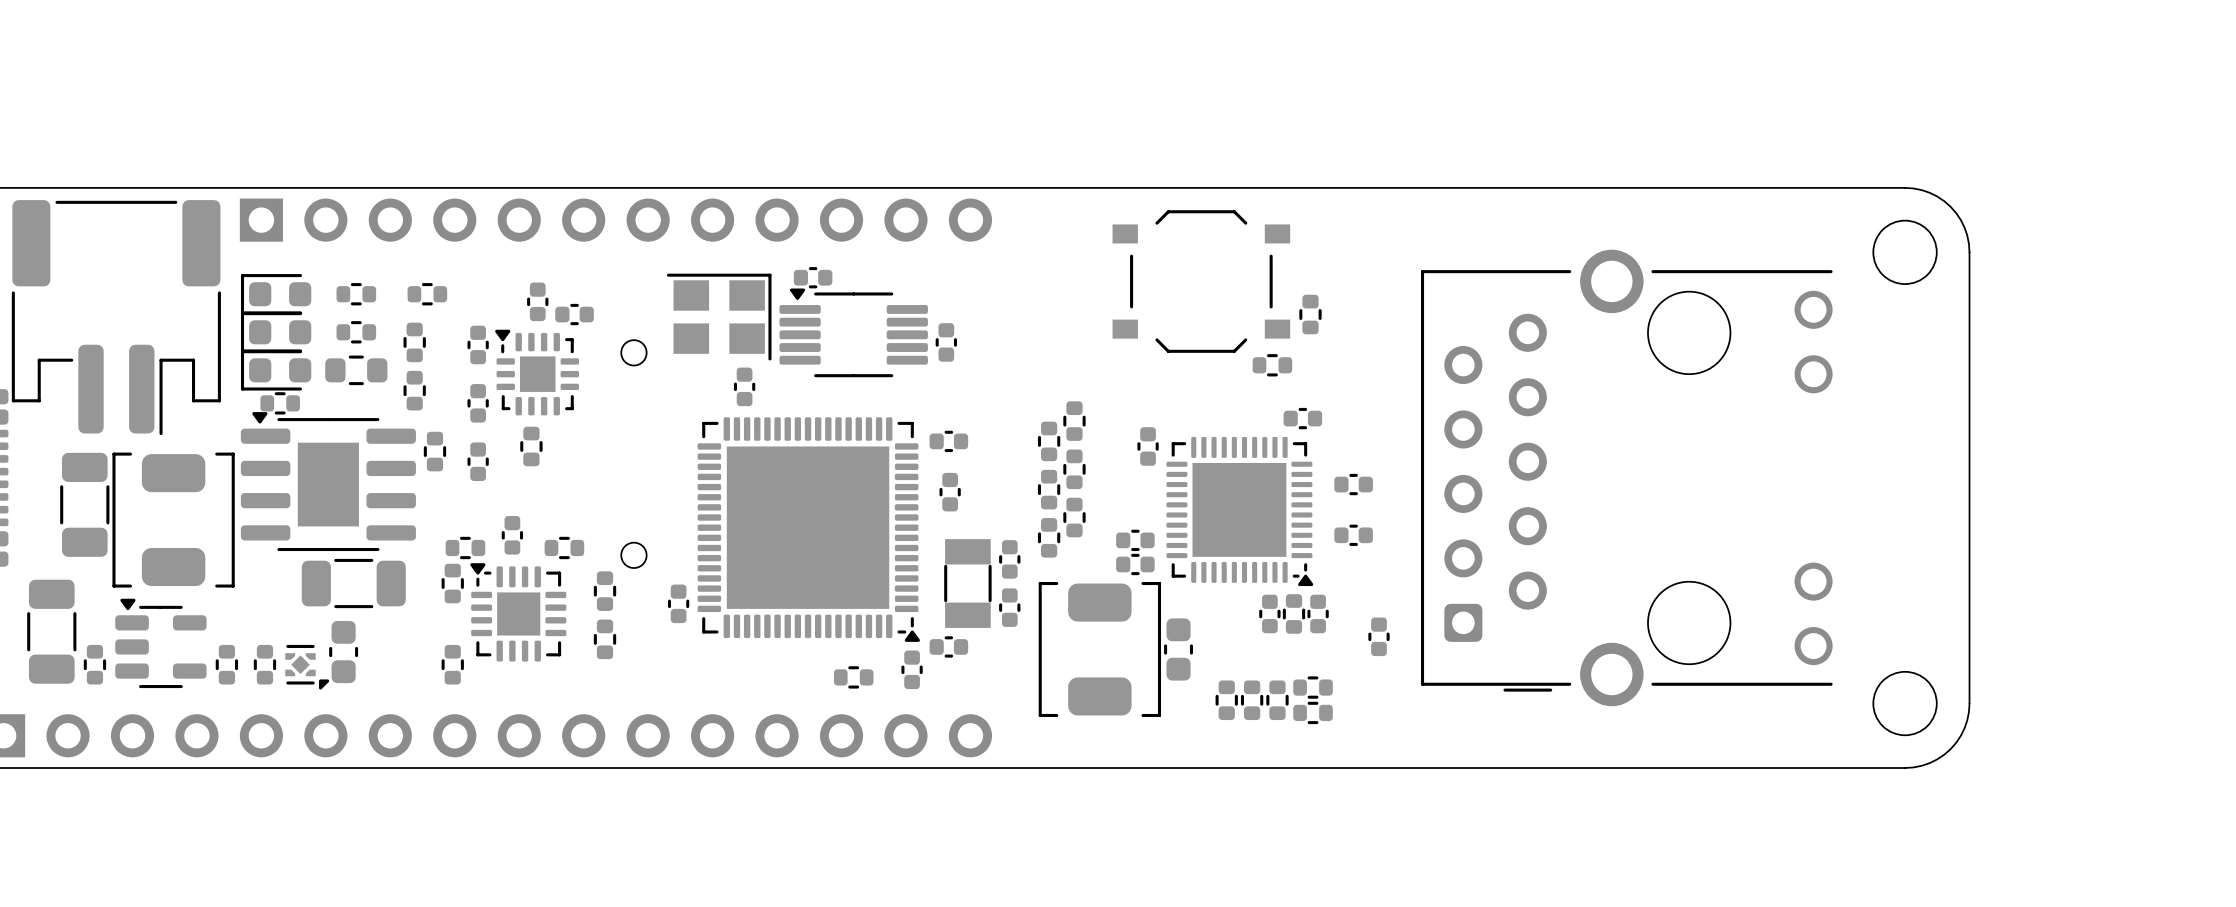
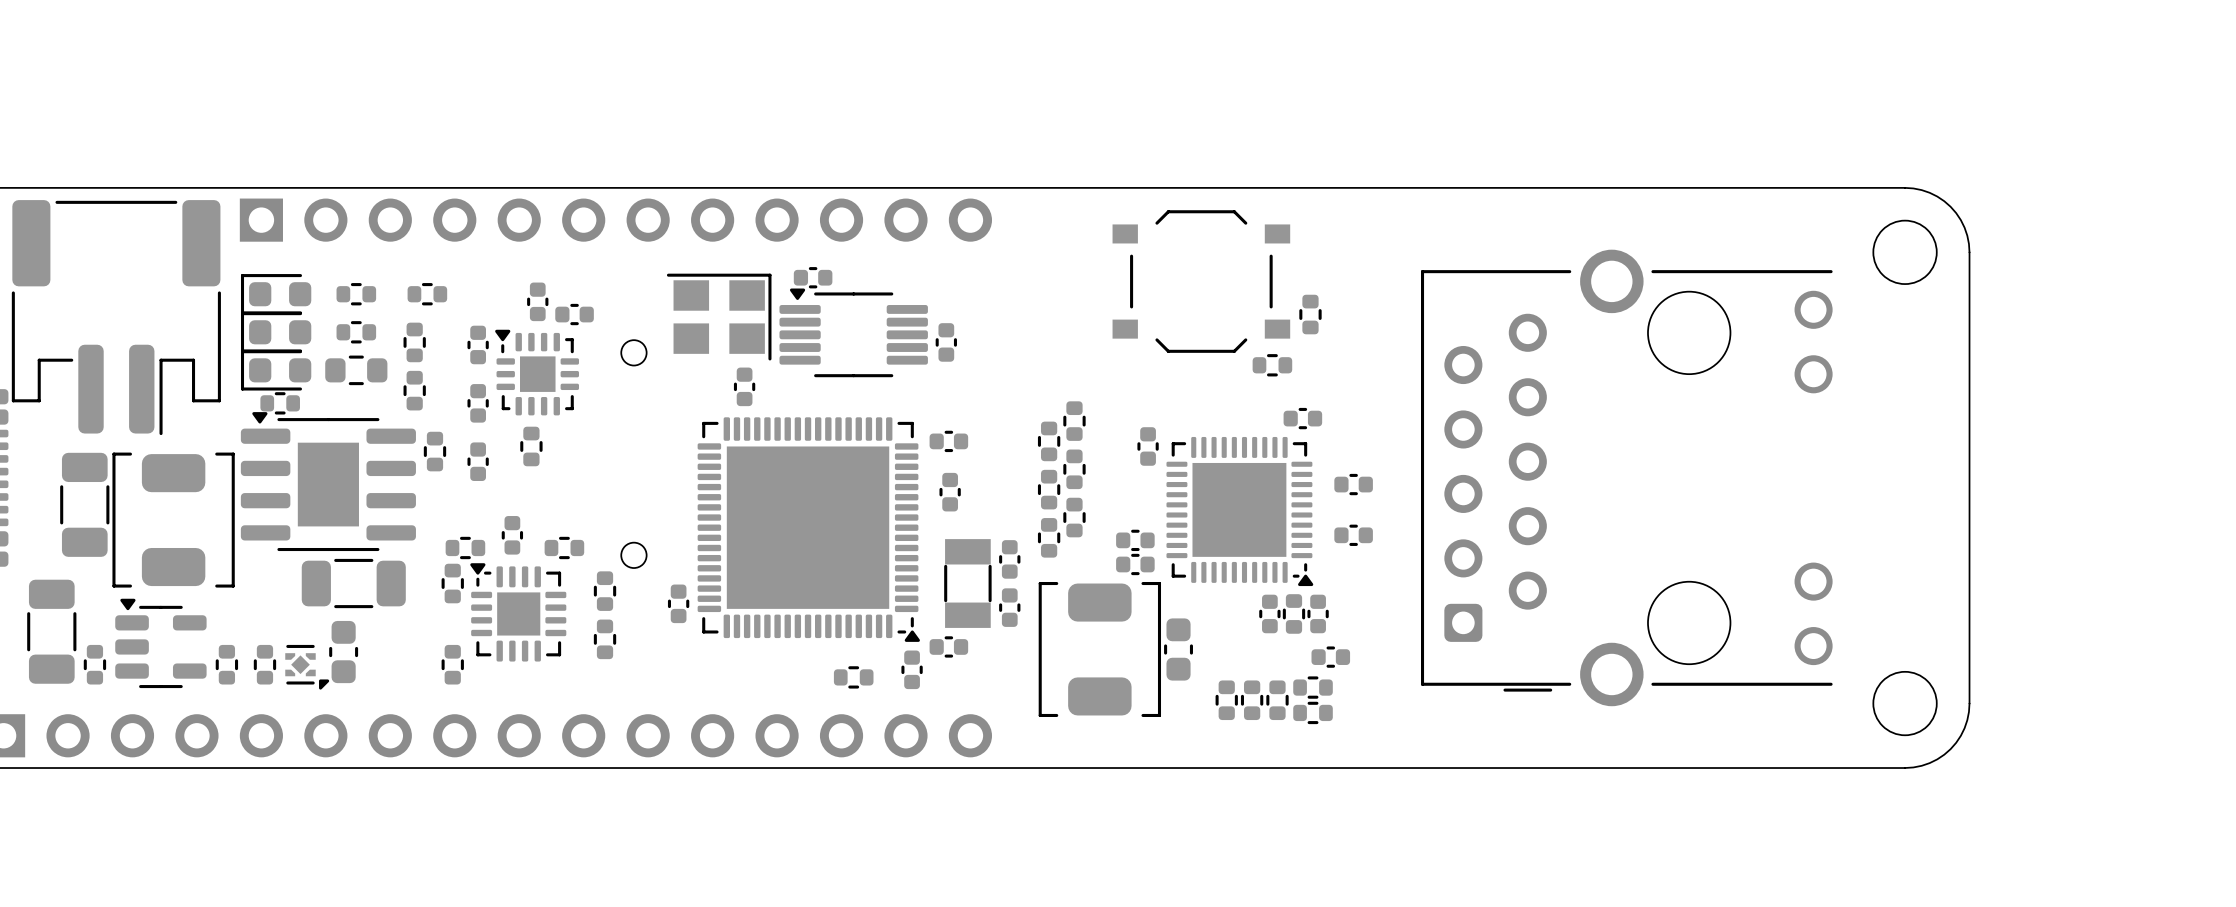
part rotation: 0° (1379, 636) -> 90° clockwise (1330, 657)
part position: (1379, 636) -> (1330, 657)

